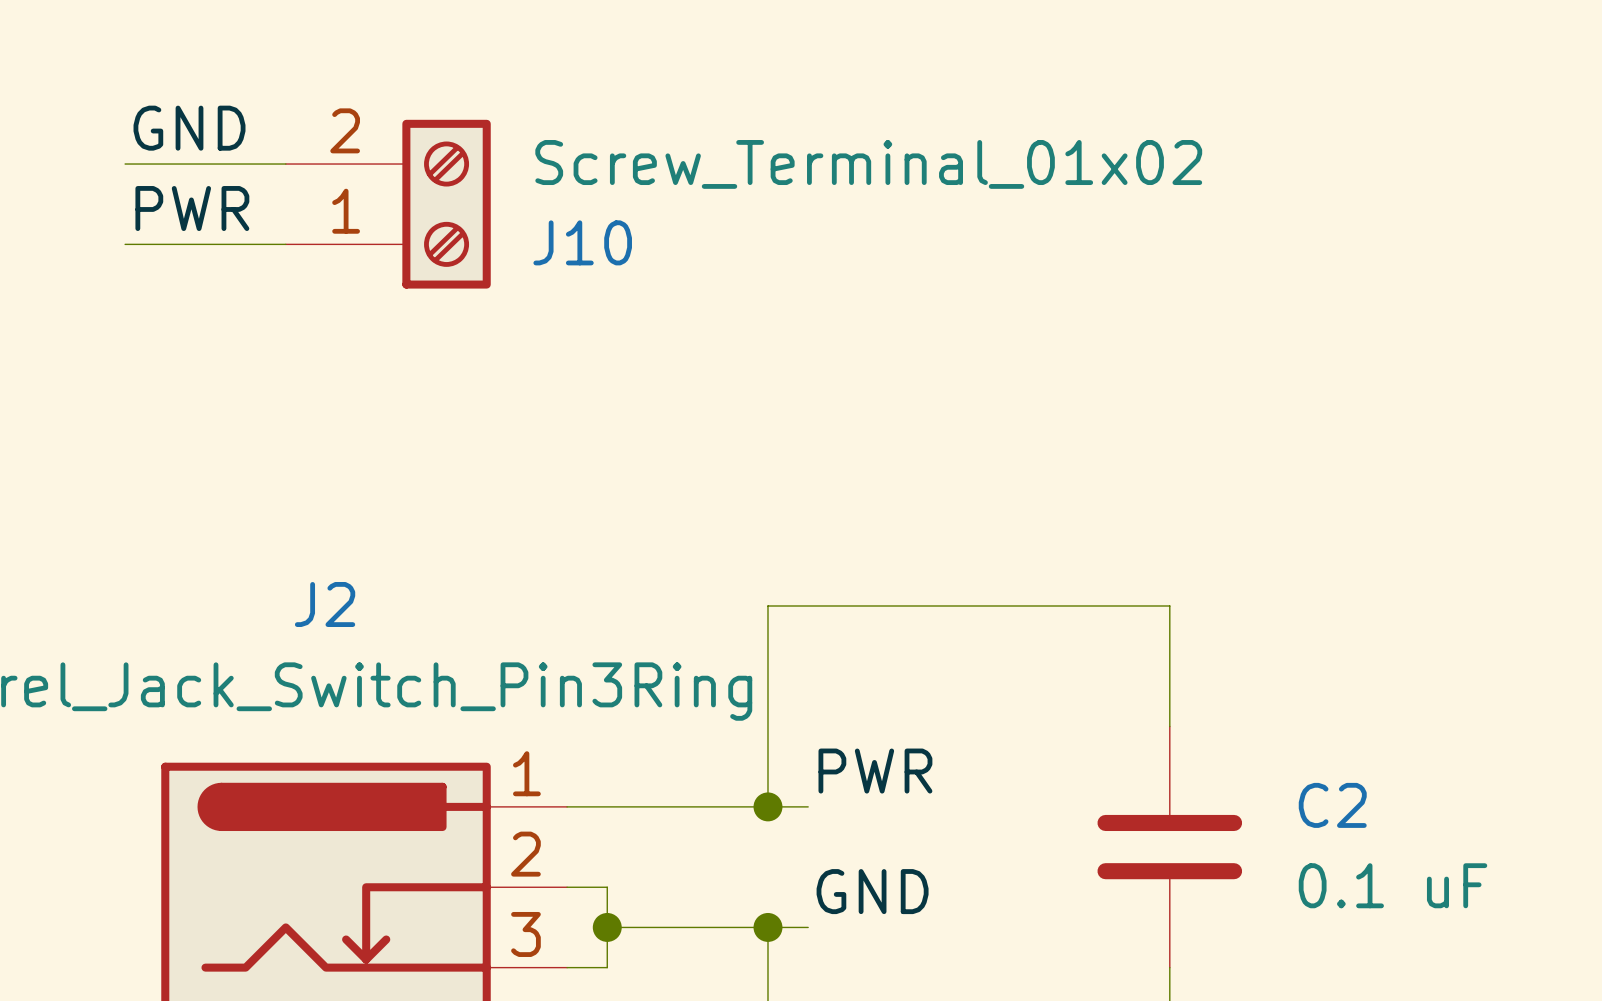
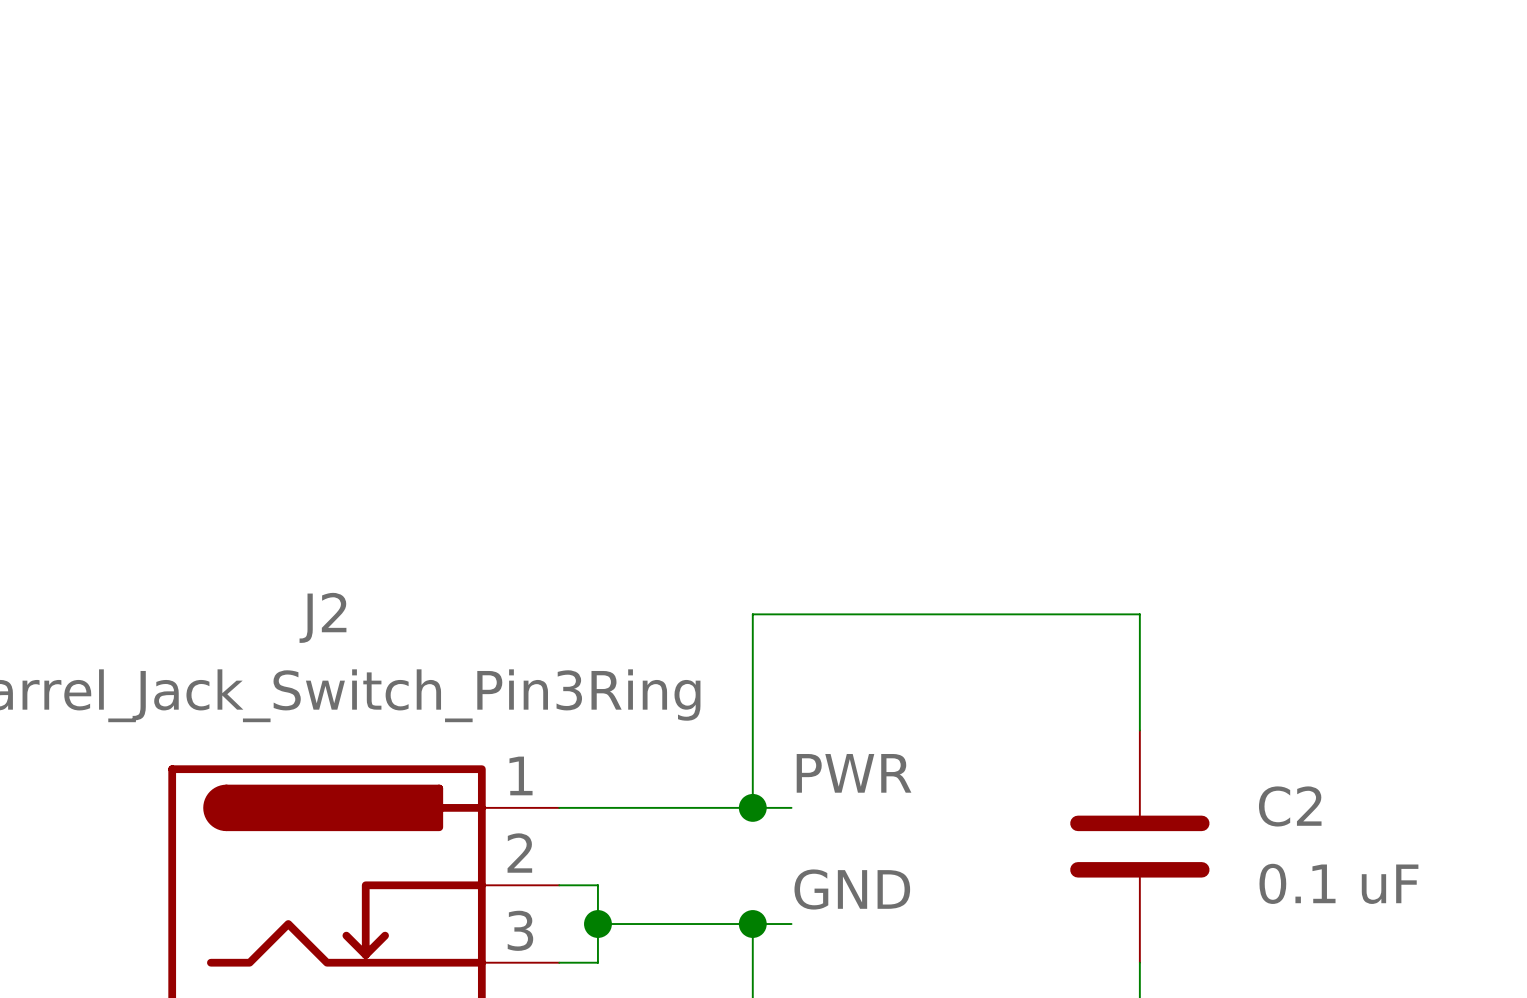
label: GND (189, 128) -> none
wire: (125, 164) (285, 164) -> none
J10: Screw_Terminal_01x02 (388, 204) -> none
label: PWR (192, 208) -> none
wire: (125, 244) (285, 244) -> none

